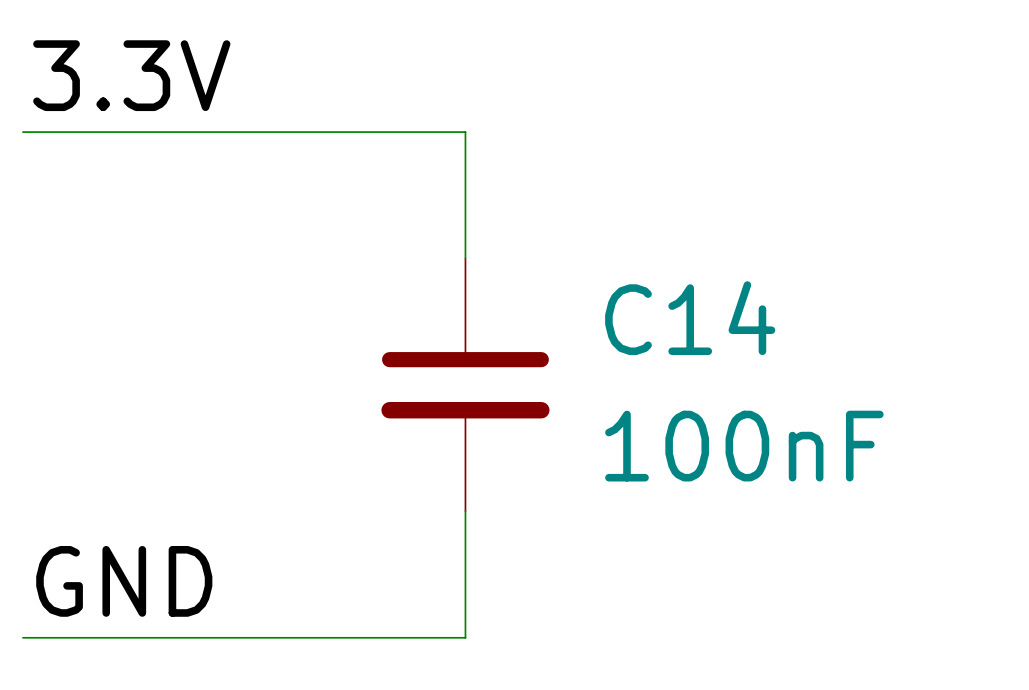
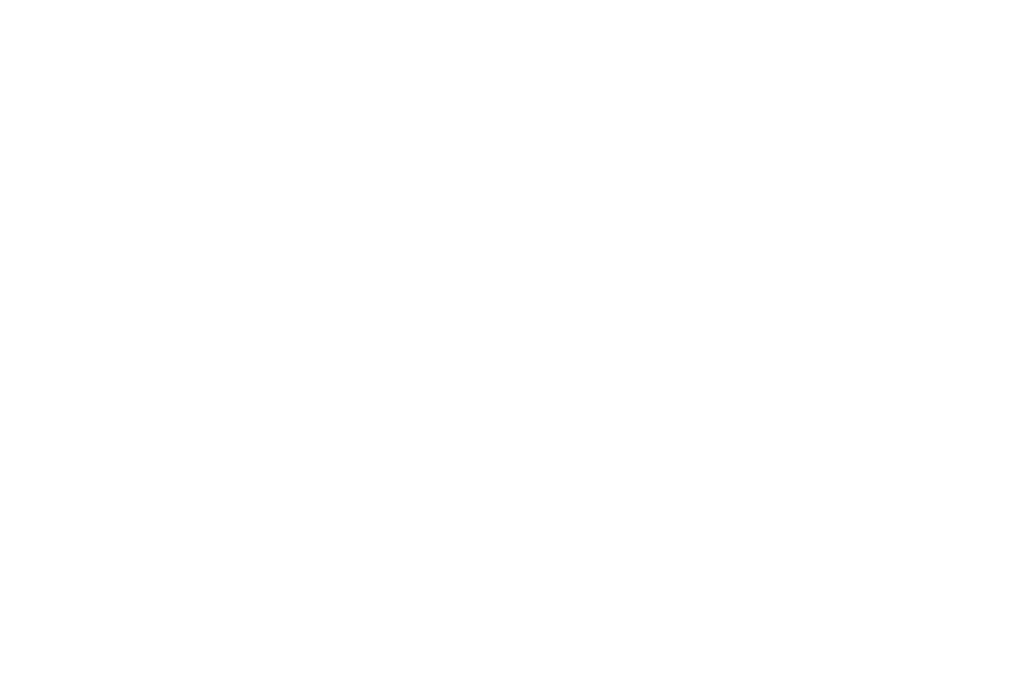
label: 3.3V (131, 75) -> none
wire: (22, 132) (465, 132) (465, 258) -> none
C14: 100nF (465, 384) -> none
wire: (465, 511) (465, 637) (22, 637) -> none
label: GND (124, 581) -> none

